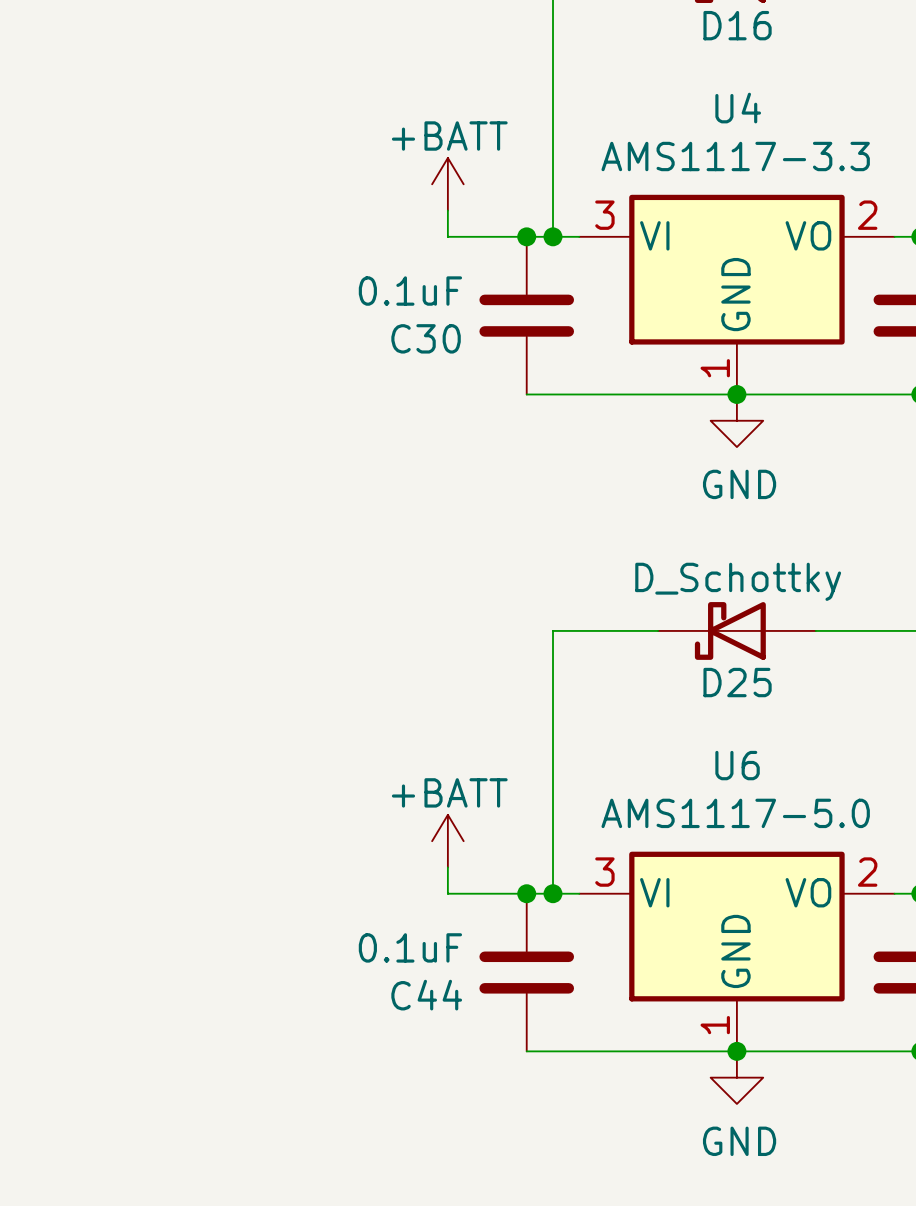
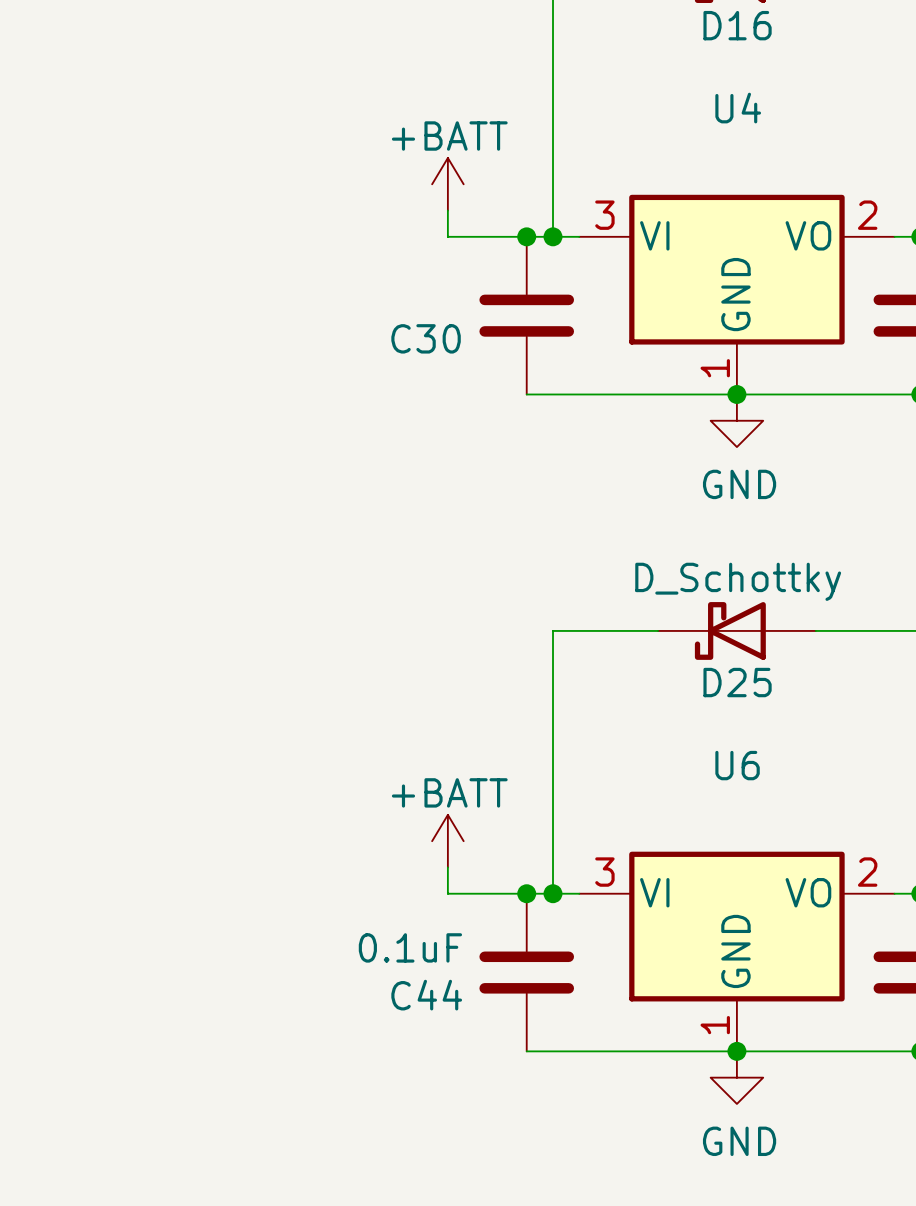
U4 value: AMS1117-3.3 (735, 156) -> none
C30 value: 0.1uF (410, 291) -> none
U6 value: AMS1117-5.0 (735, 813) -> none

